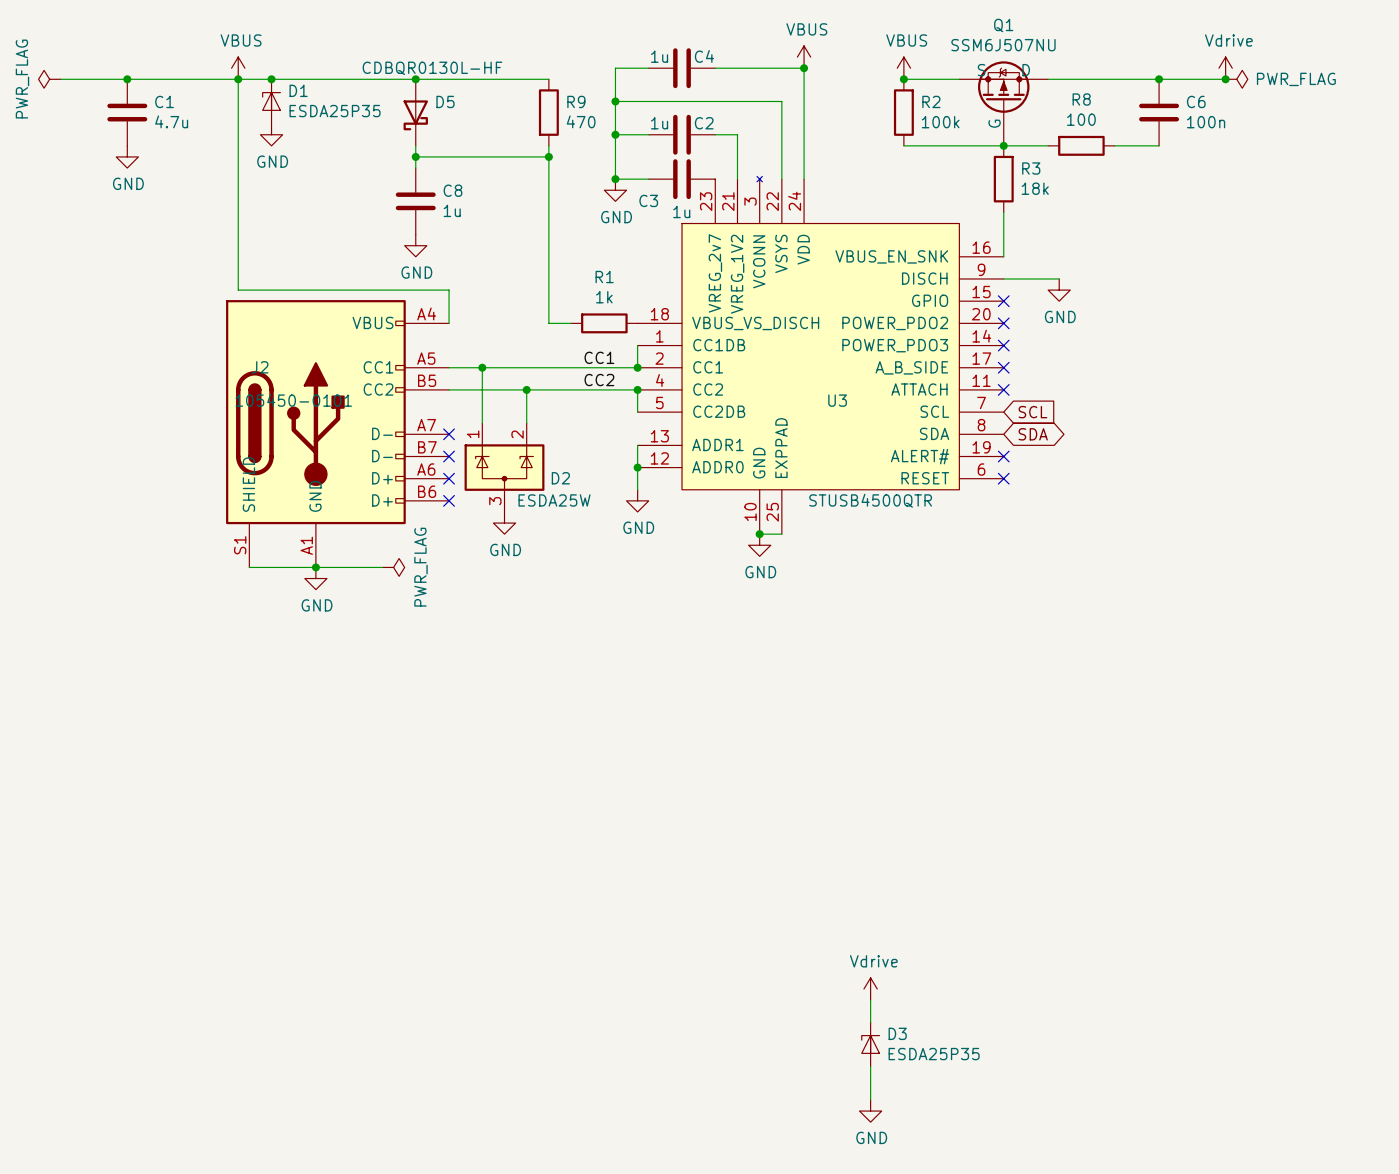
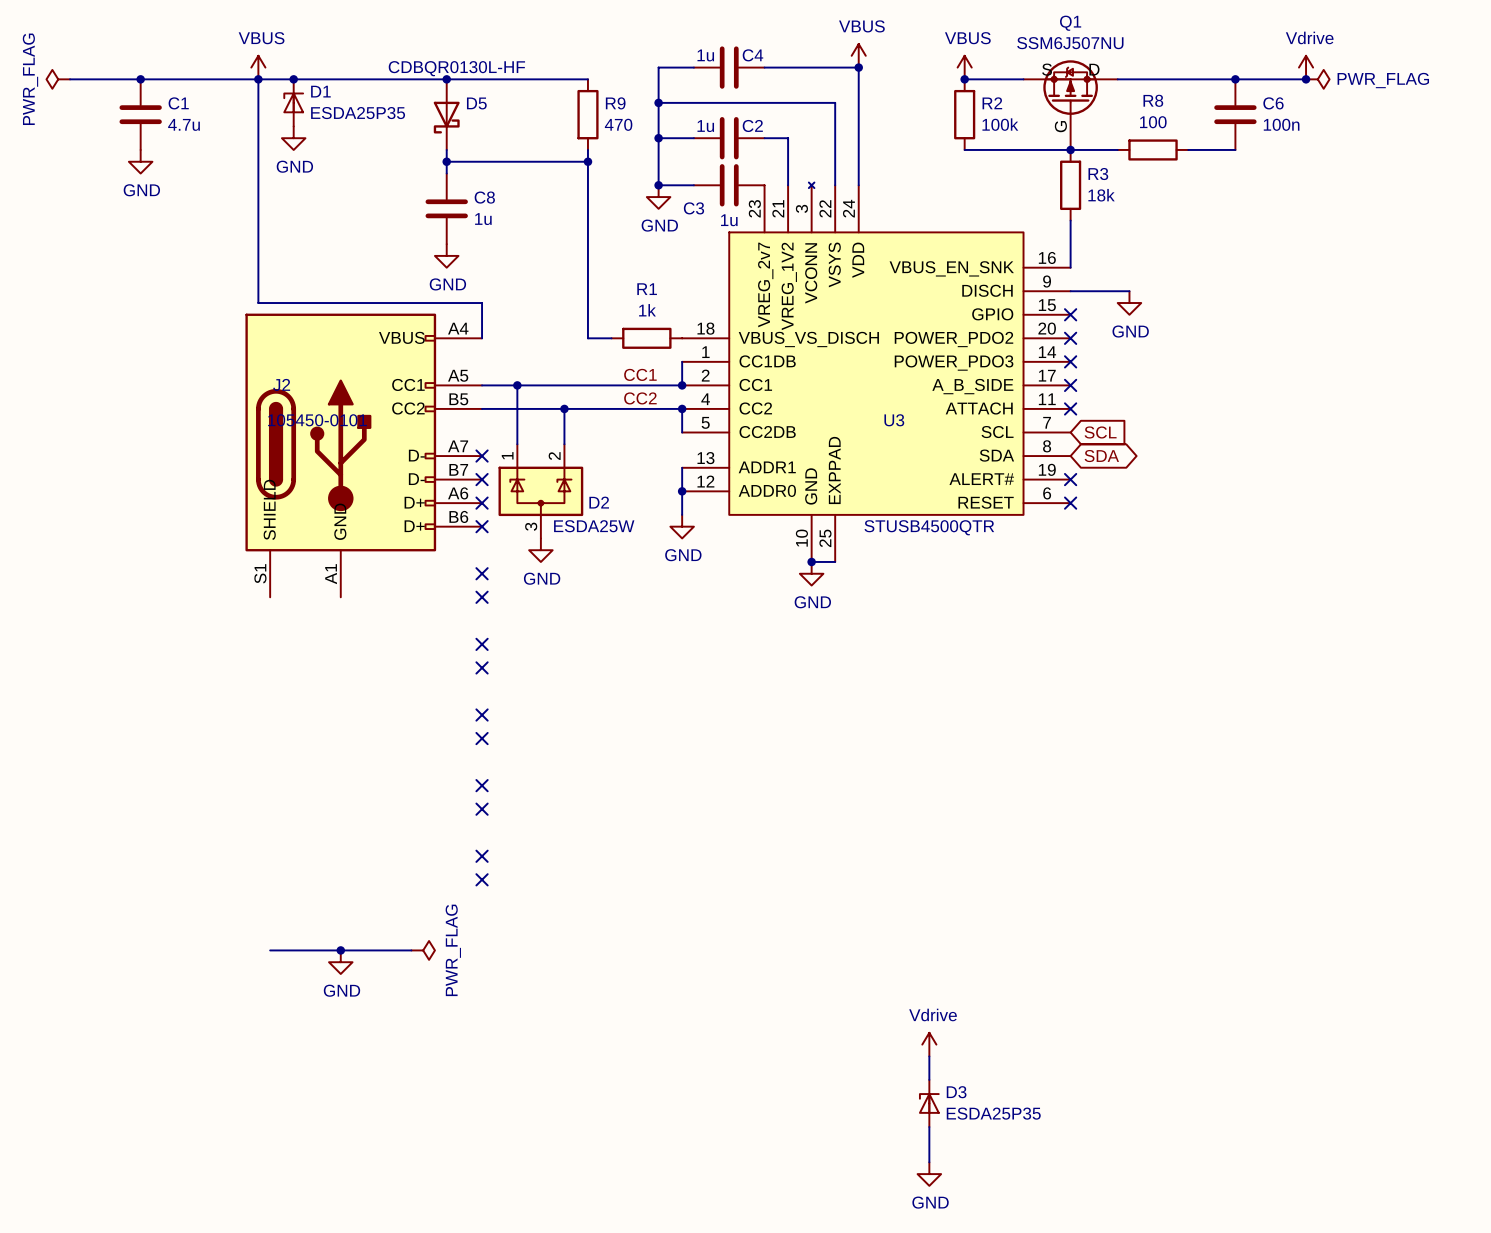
no-connect mark: none -> (482, 573)
wire: (249, 567) (382, 567) -> none
junction: (315, 567) -> none
power symbol: PWR_FLAG (393, 567) -> none
no-connect mark: none -> (482, 597)
power symbol: GND (315, 578) -> none
no-connect mark: none -> (482, 644)
no-connect mark: none -> (482, 667)
no-connect mark: none -> (482, 715)
no-connect mark: none -> (482, 738)
no-connect mark: none -> (482, 785)
no-connect mark: none -> (482, 809)
no-connect mark: none -> (482, 856)
no-connect mark: none -> (482, 879)
wire: none -> (270, 950) (411, 950)
junction: none -> (340, 950)
power symbol: none -> PWR_FLAG (423, 950)
power symbol: none -> GND (340, 962)

